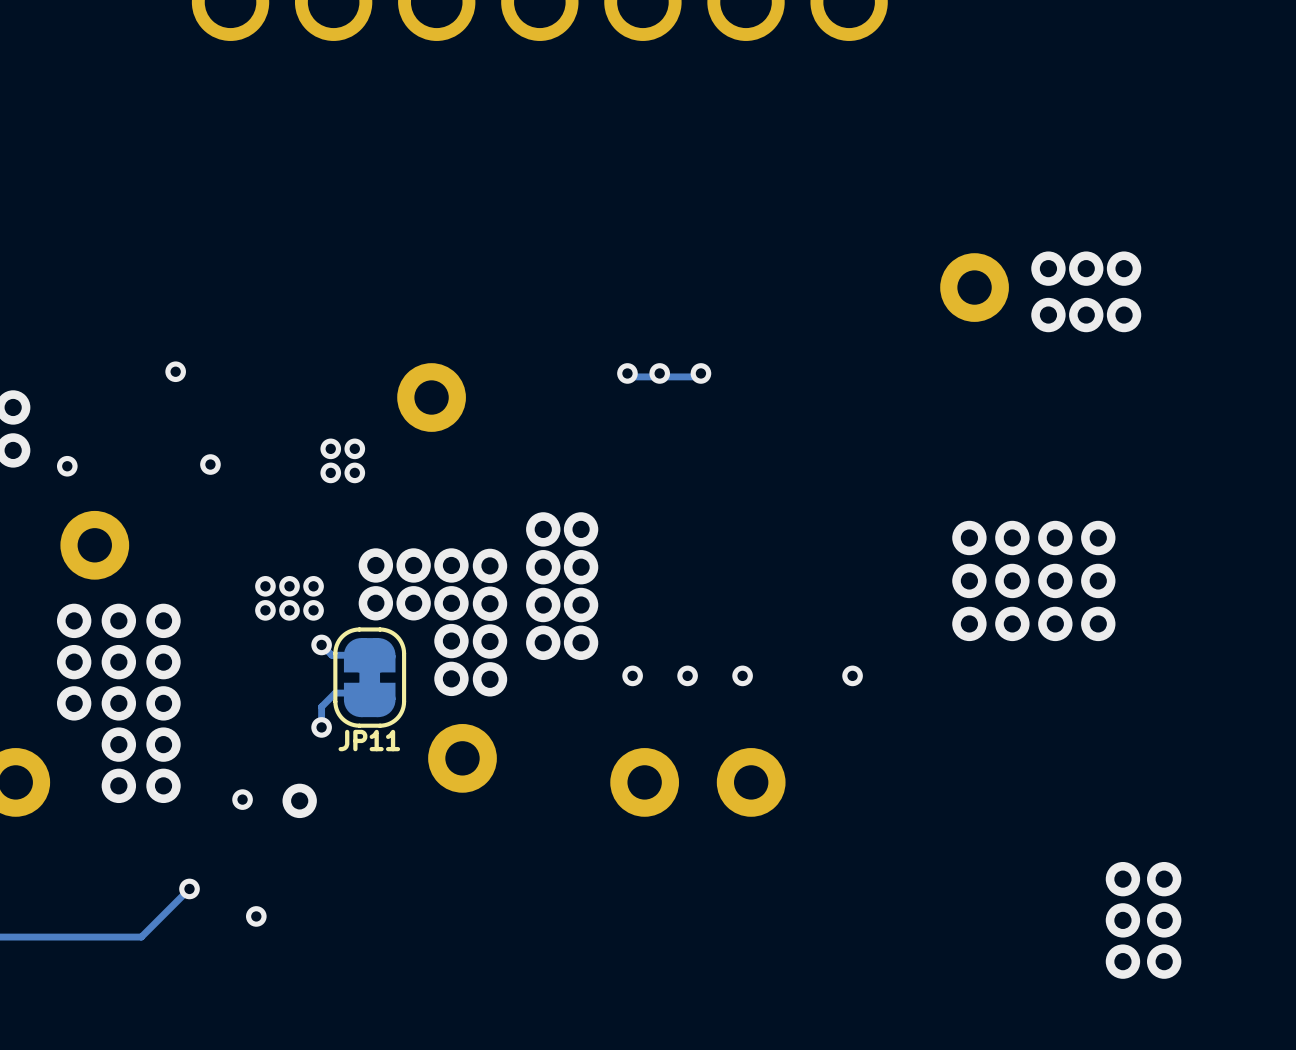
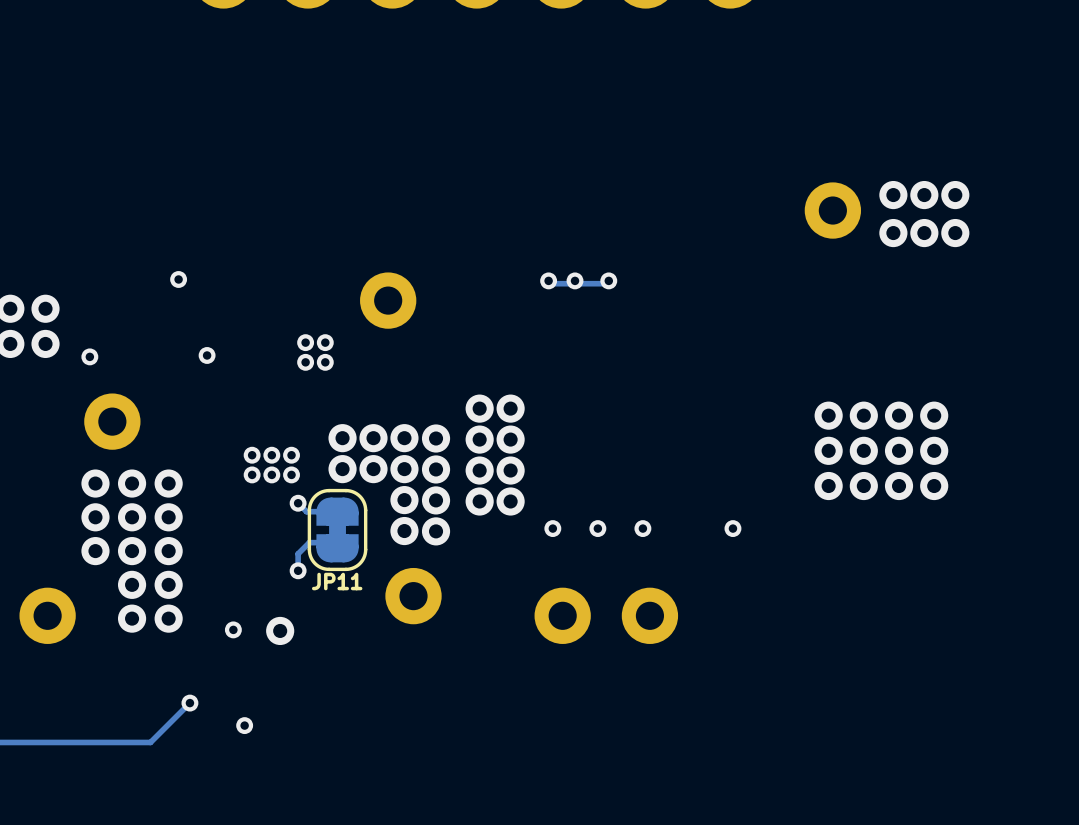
via: (1122, 879) -> none
via: (1164, 879) -> none
via: (1122, 920) -> none
via: (1164, 920) -> none
via: (1122, 961) -> none
via: (1164, 961) -> none

